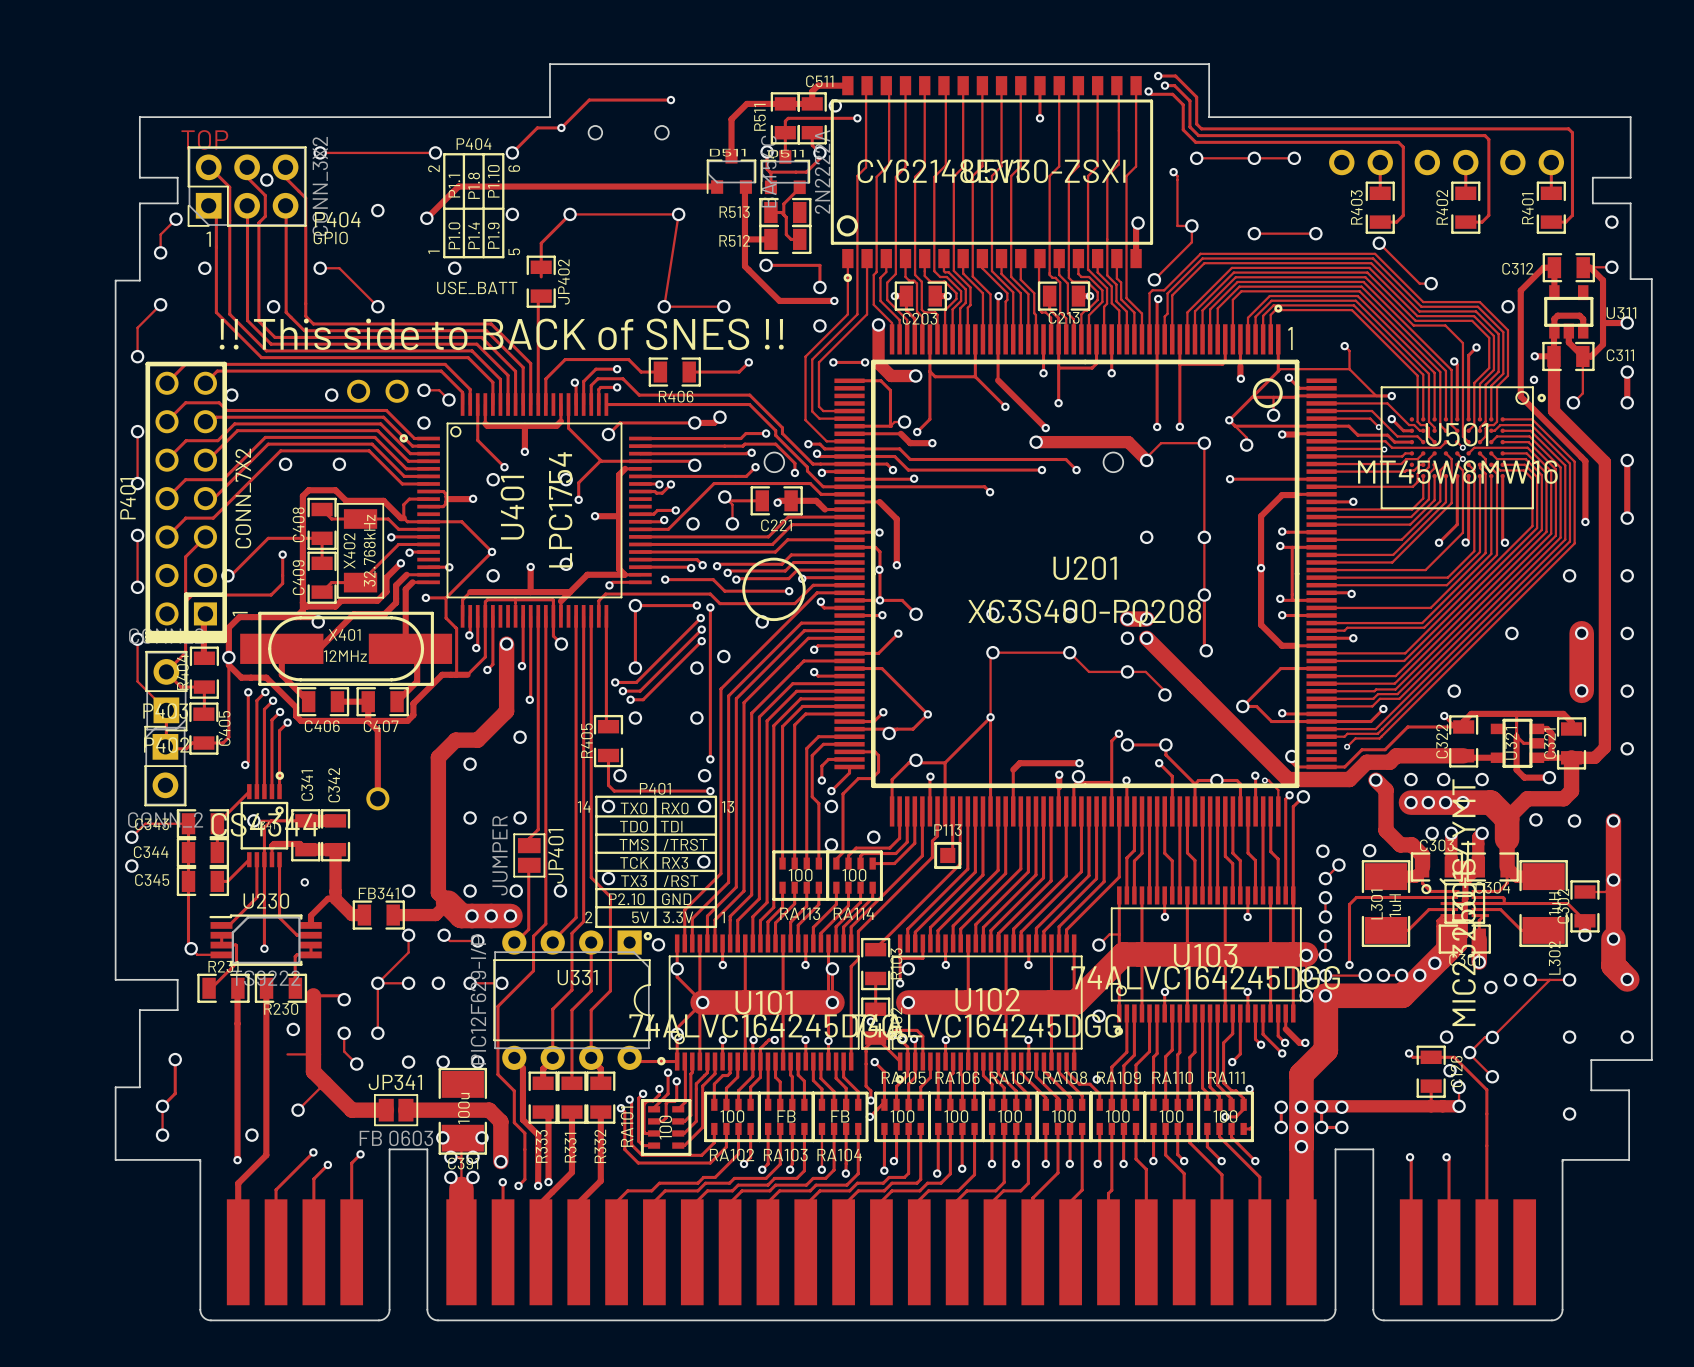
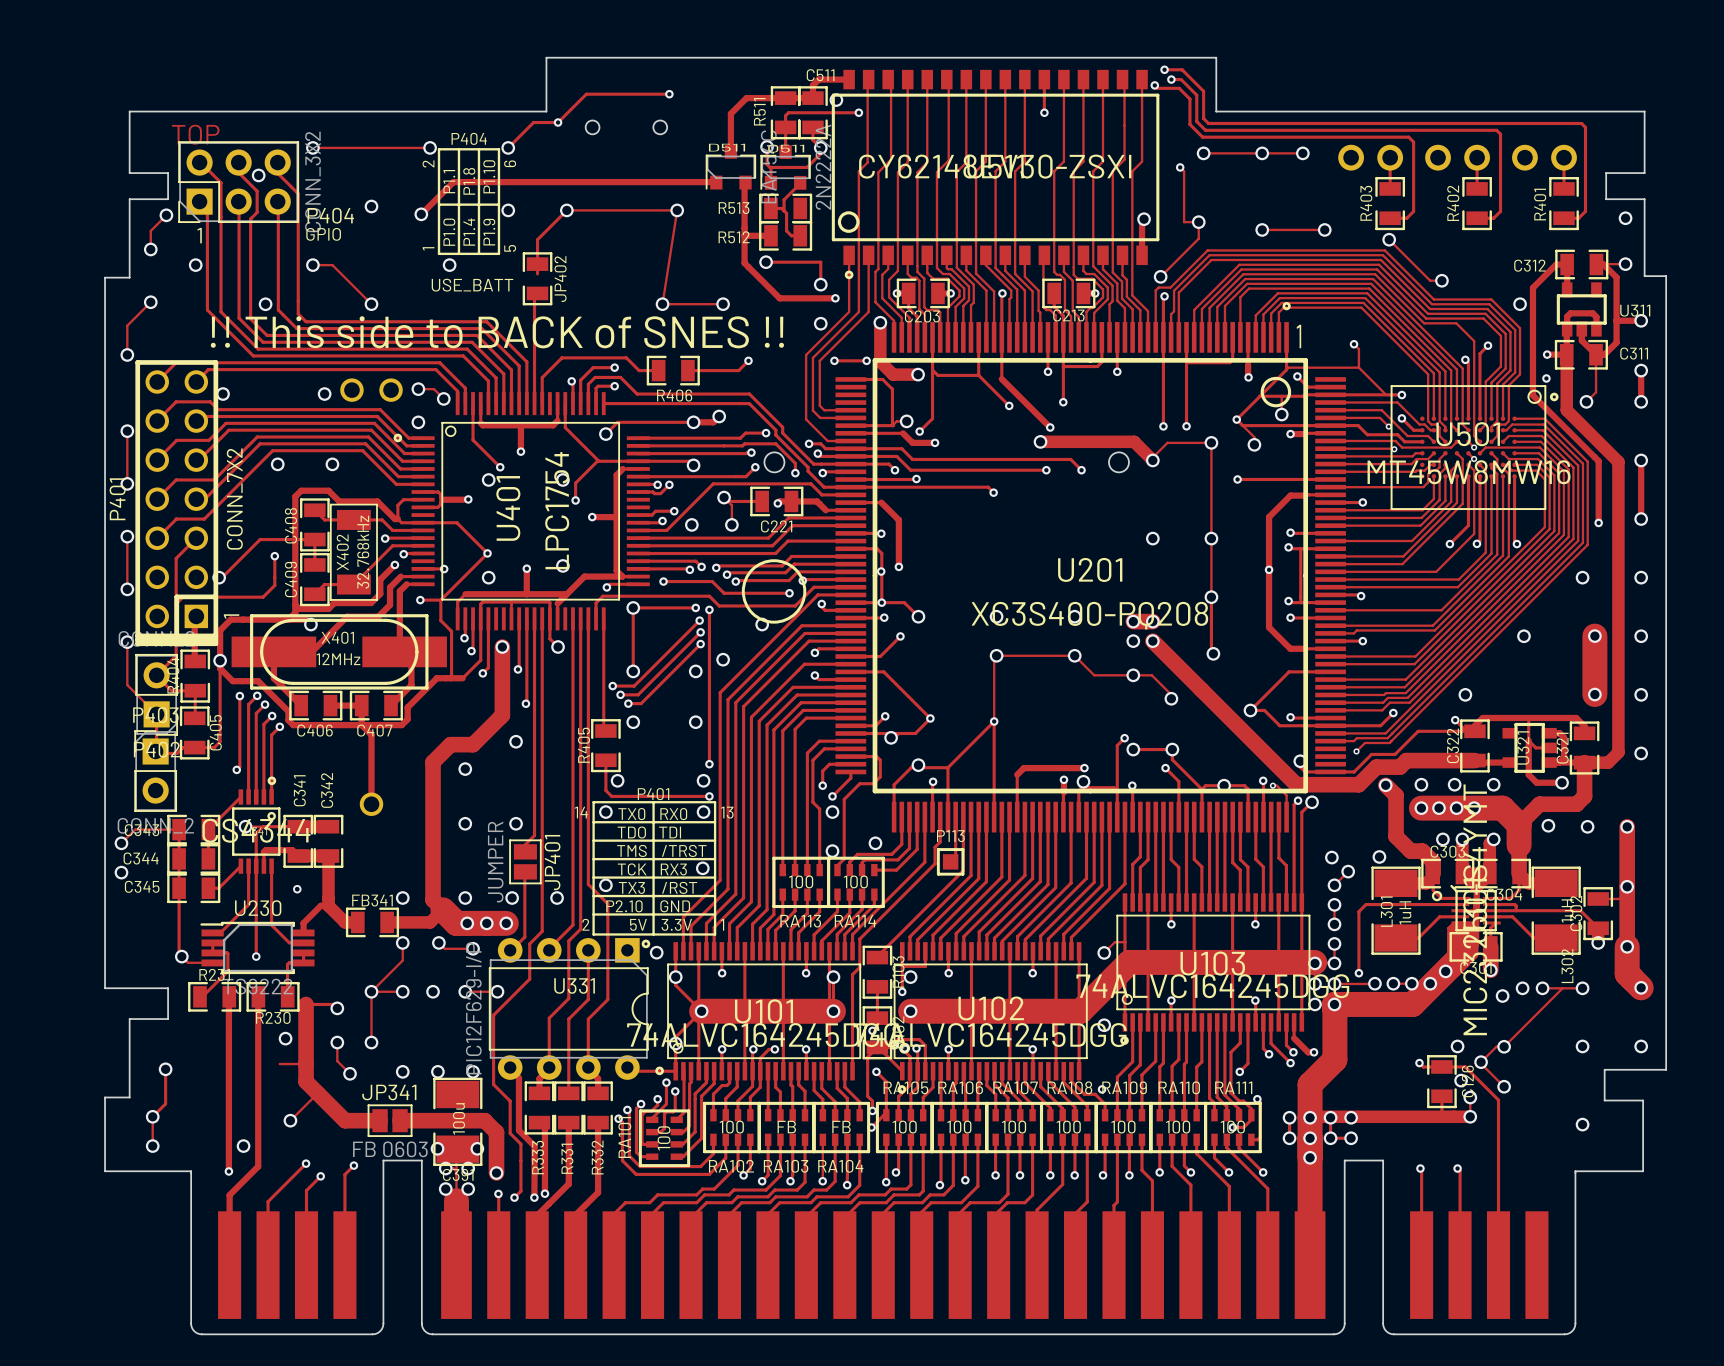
via: (828, 1040) -> none

